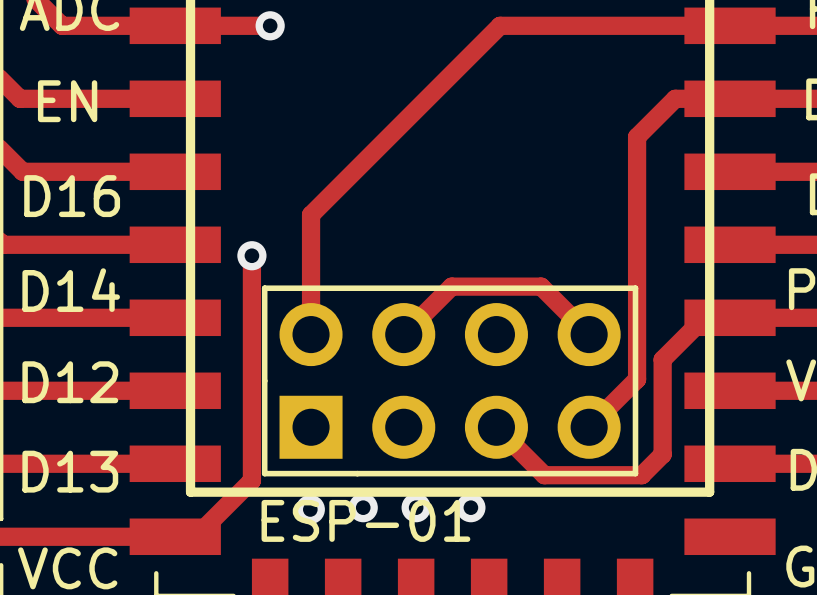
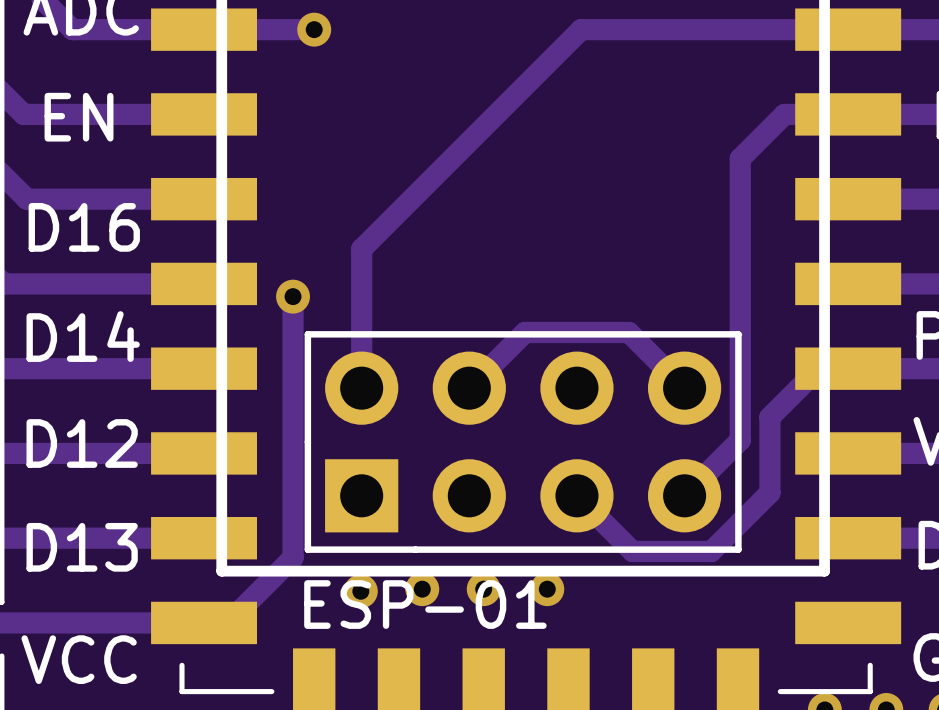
track: (662, 424) (662, 454) (641, 475) (612, 475) -> (769, 492) (711, 551)

